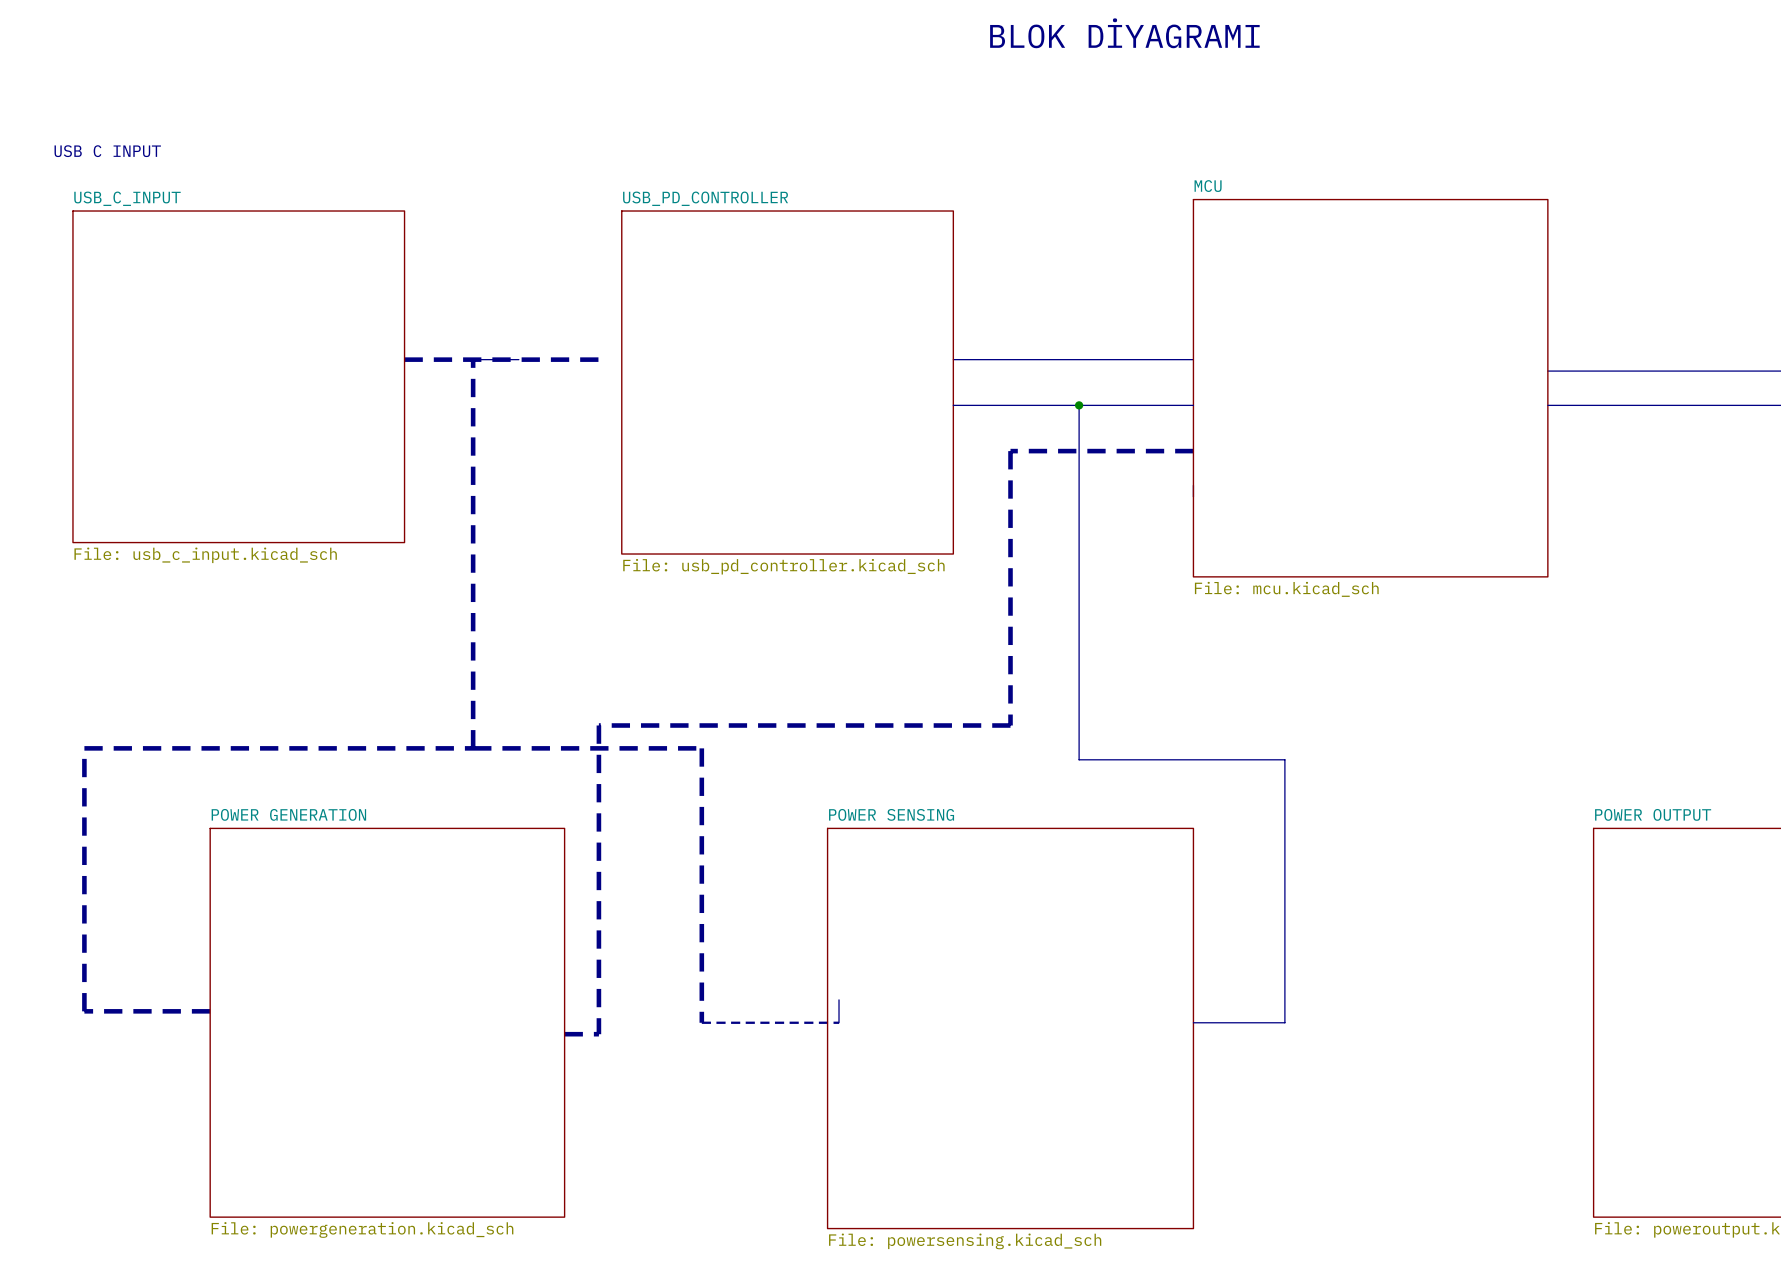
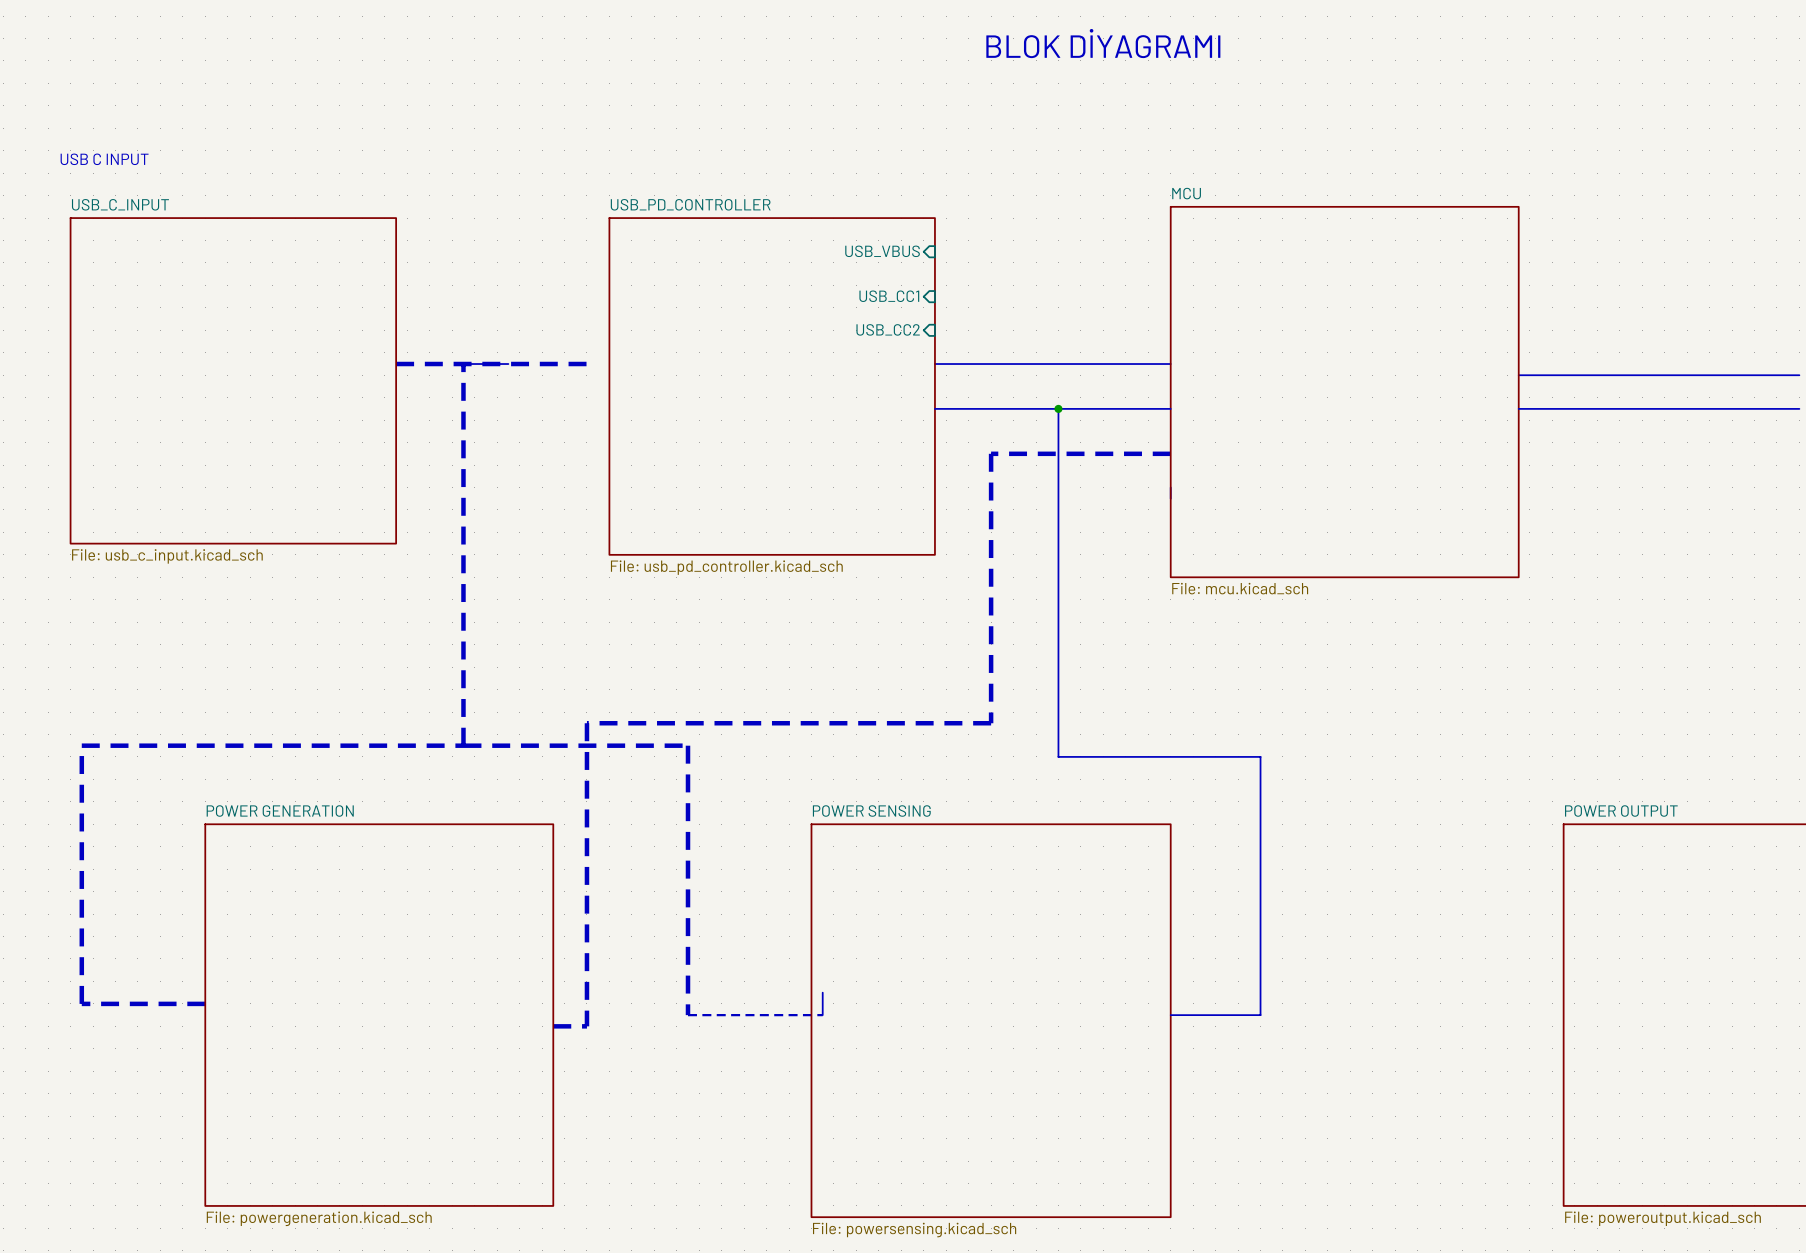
sheet pin: none -> USB_VBUS (882, 251)
sheet pin: none -> USB_CC1 (889, 296)
sheet pin: none -> USB_CC2 (888, 329)

